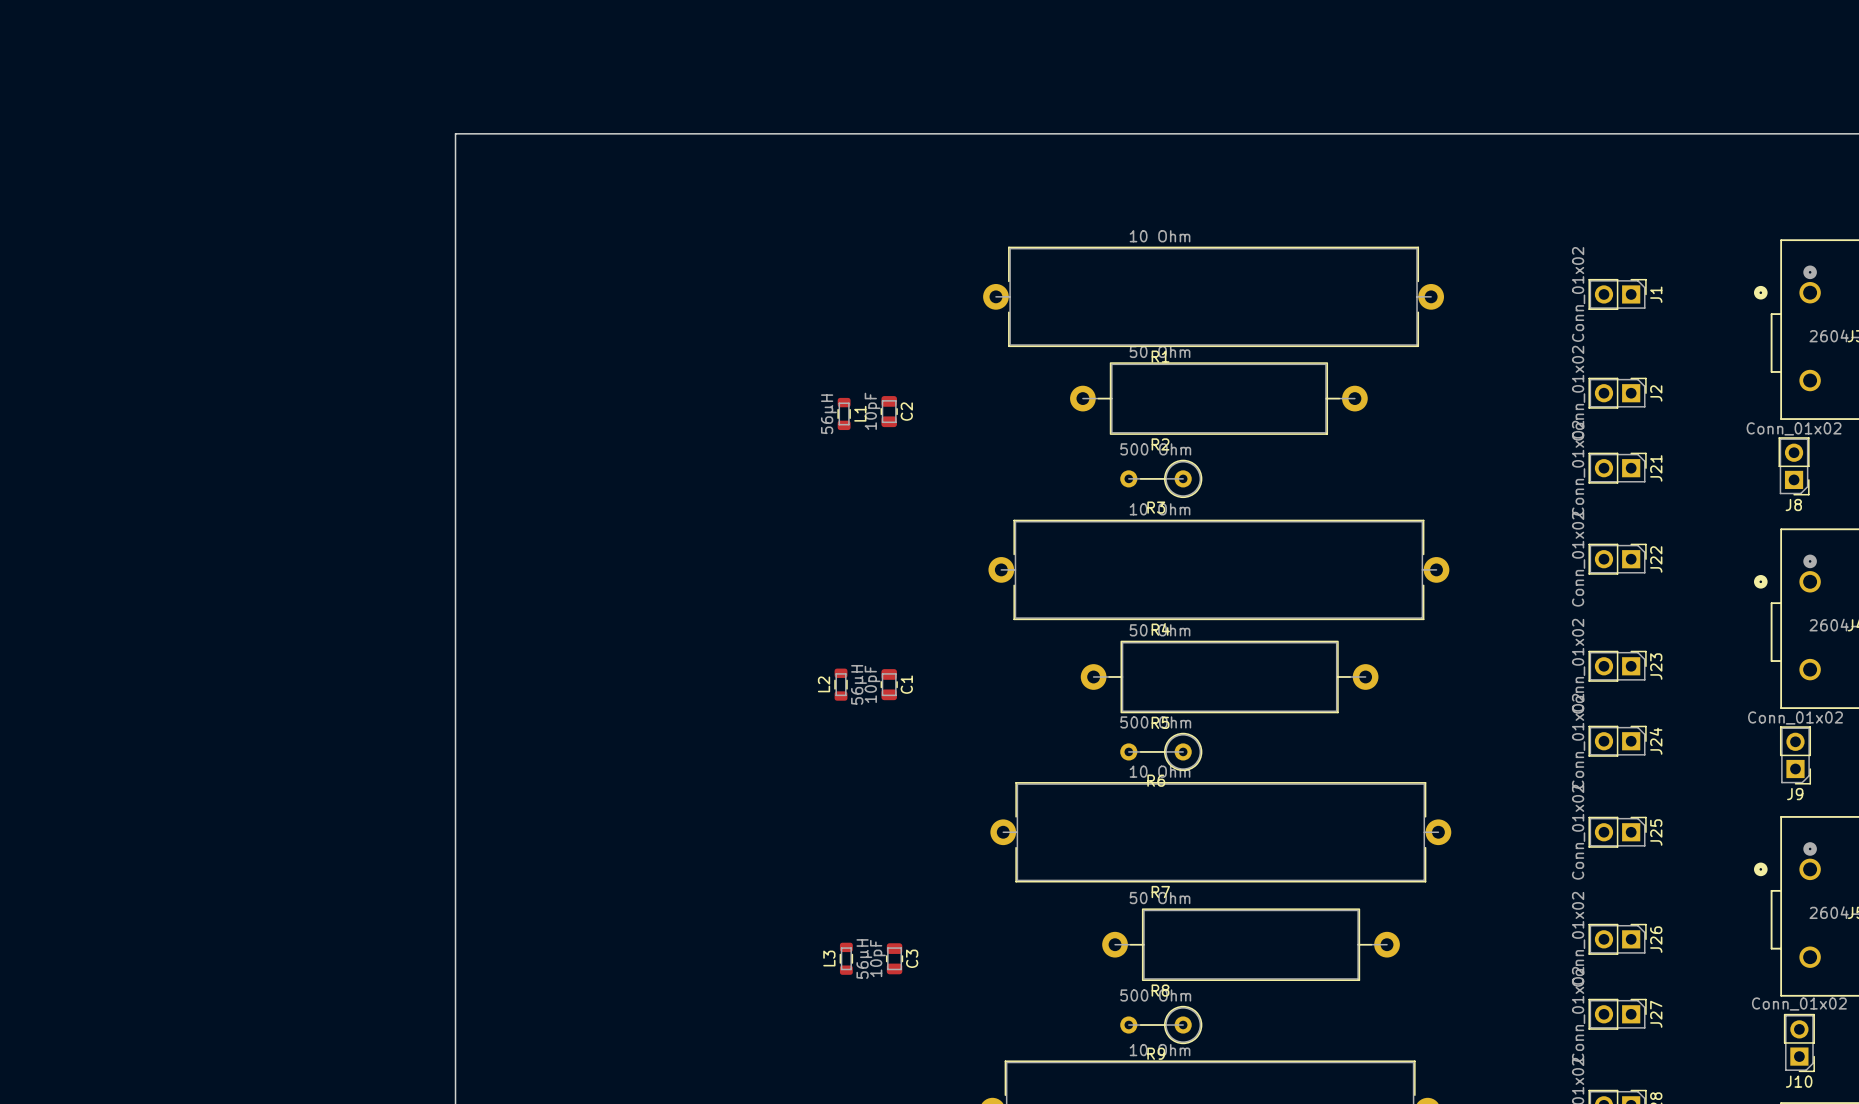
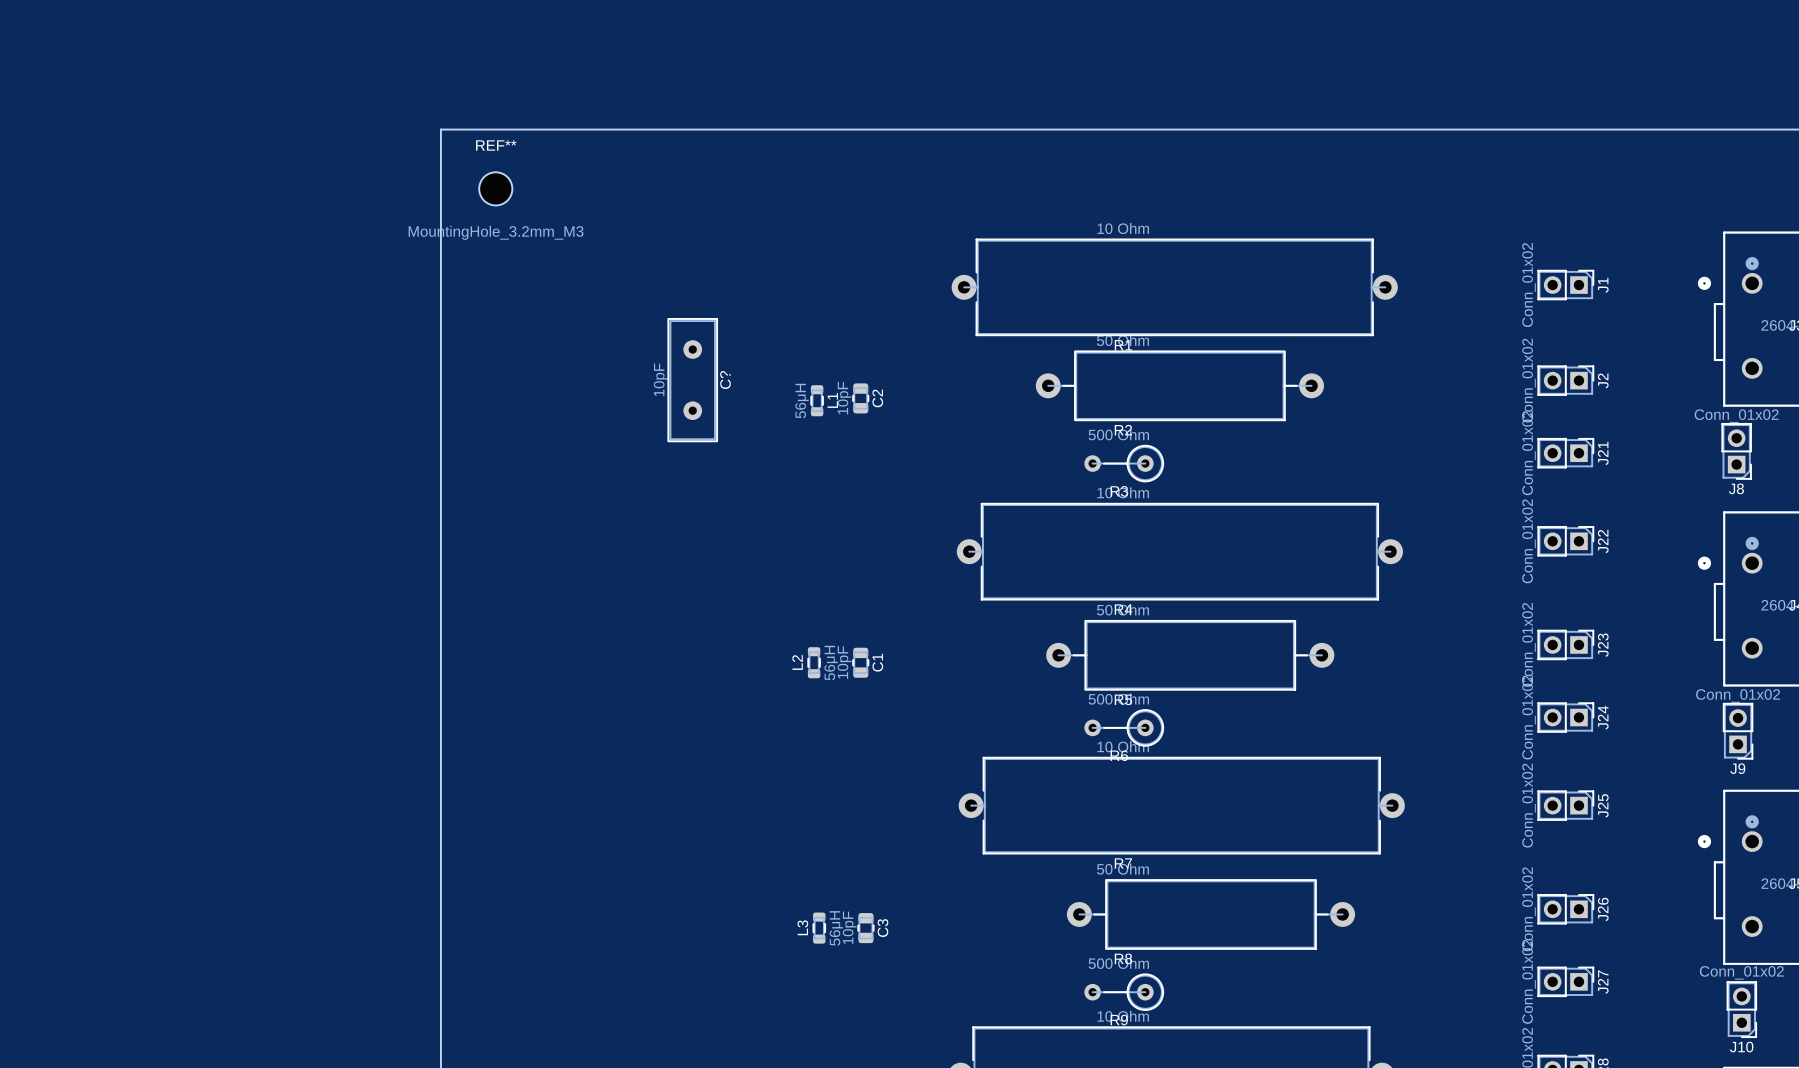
REF**: none -> MountingHole_3.2mm_M3 (495, 188)
C?: none -> 10pF (692, 380)

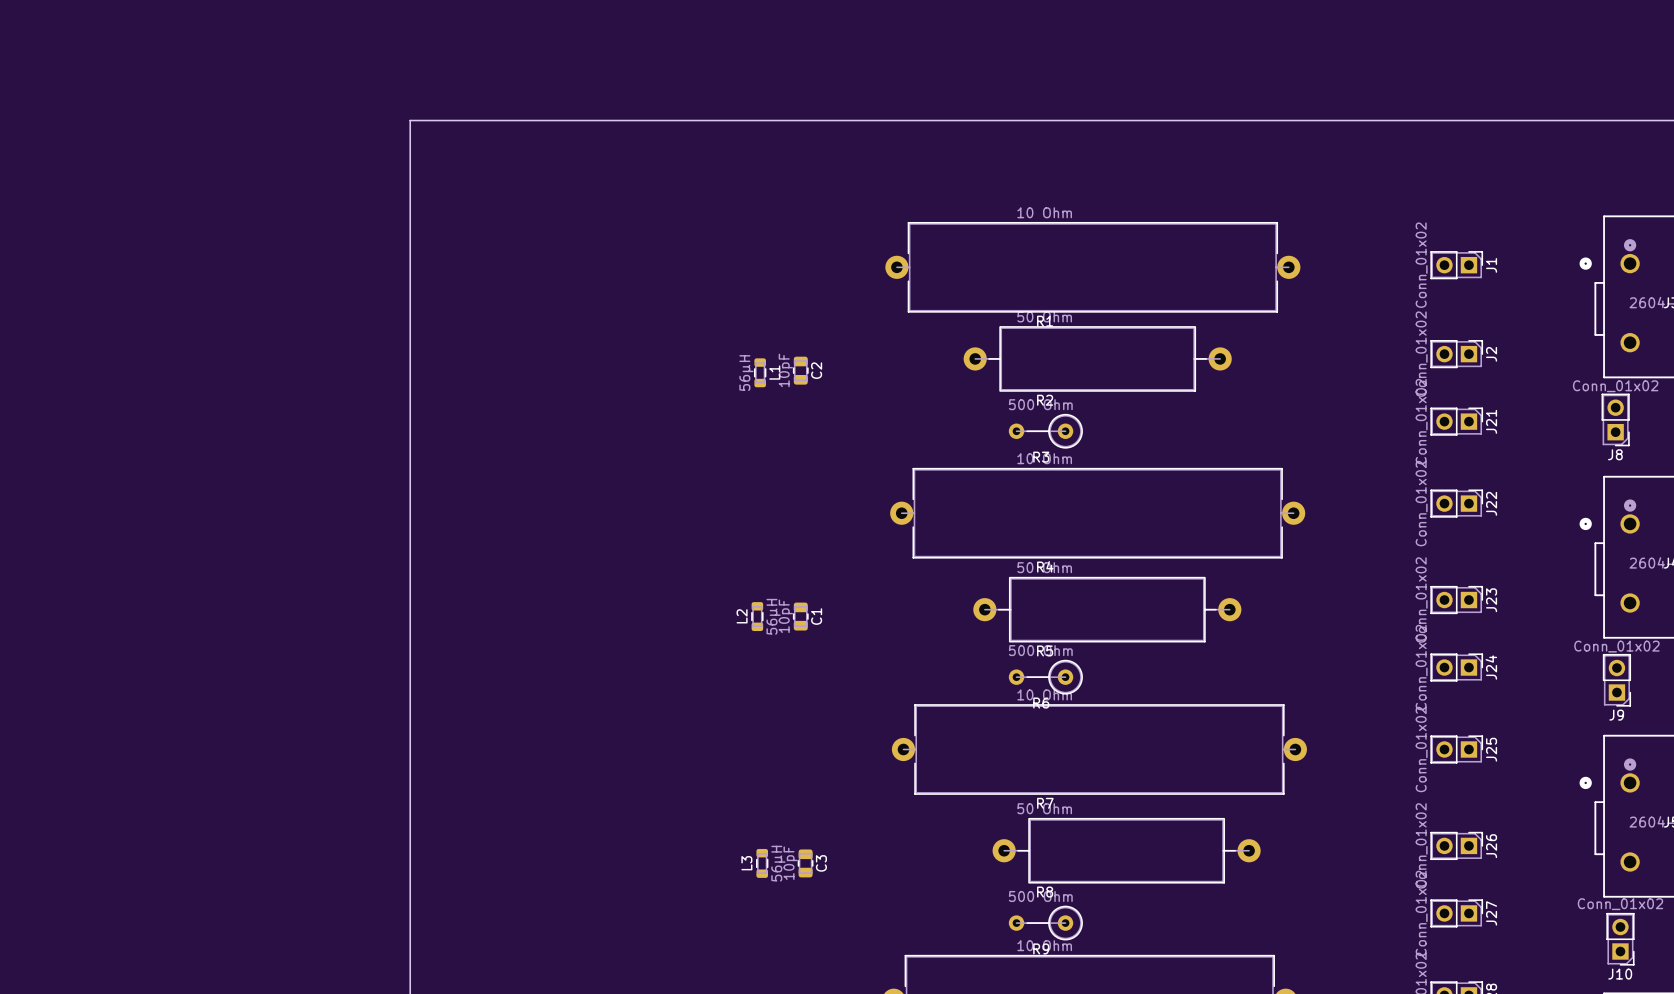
REF**: MountingHole_3.2mm_M3 (495, 188) -> none
C?: 10pF (692, 380) -> none

